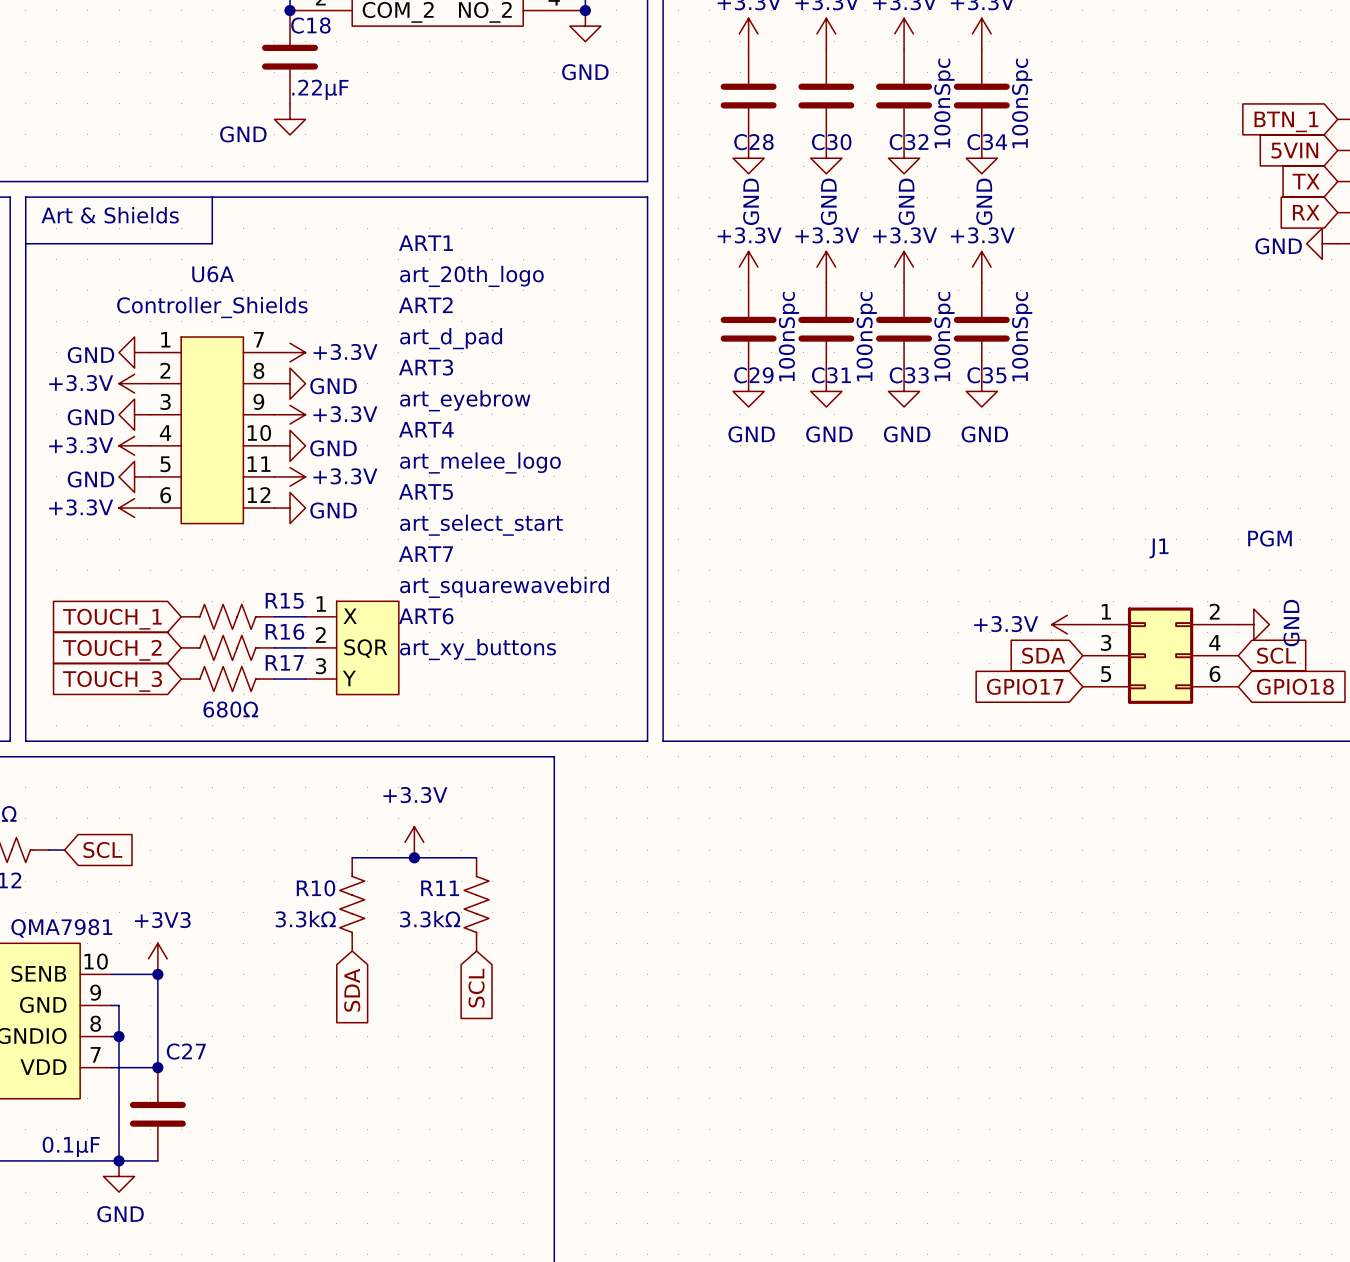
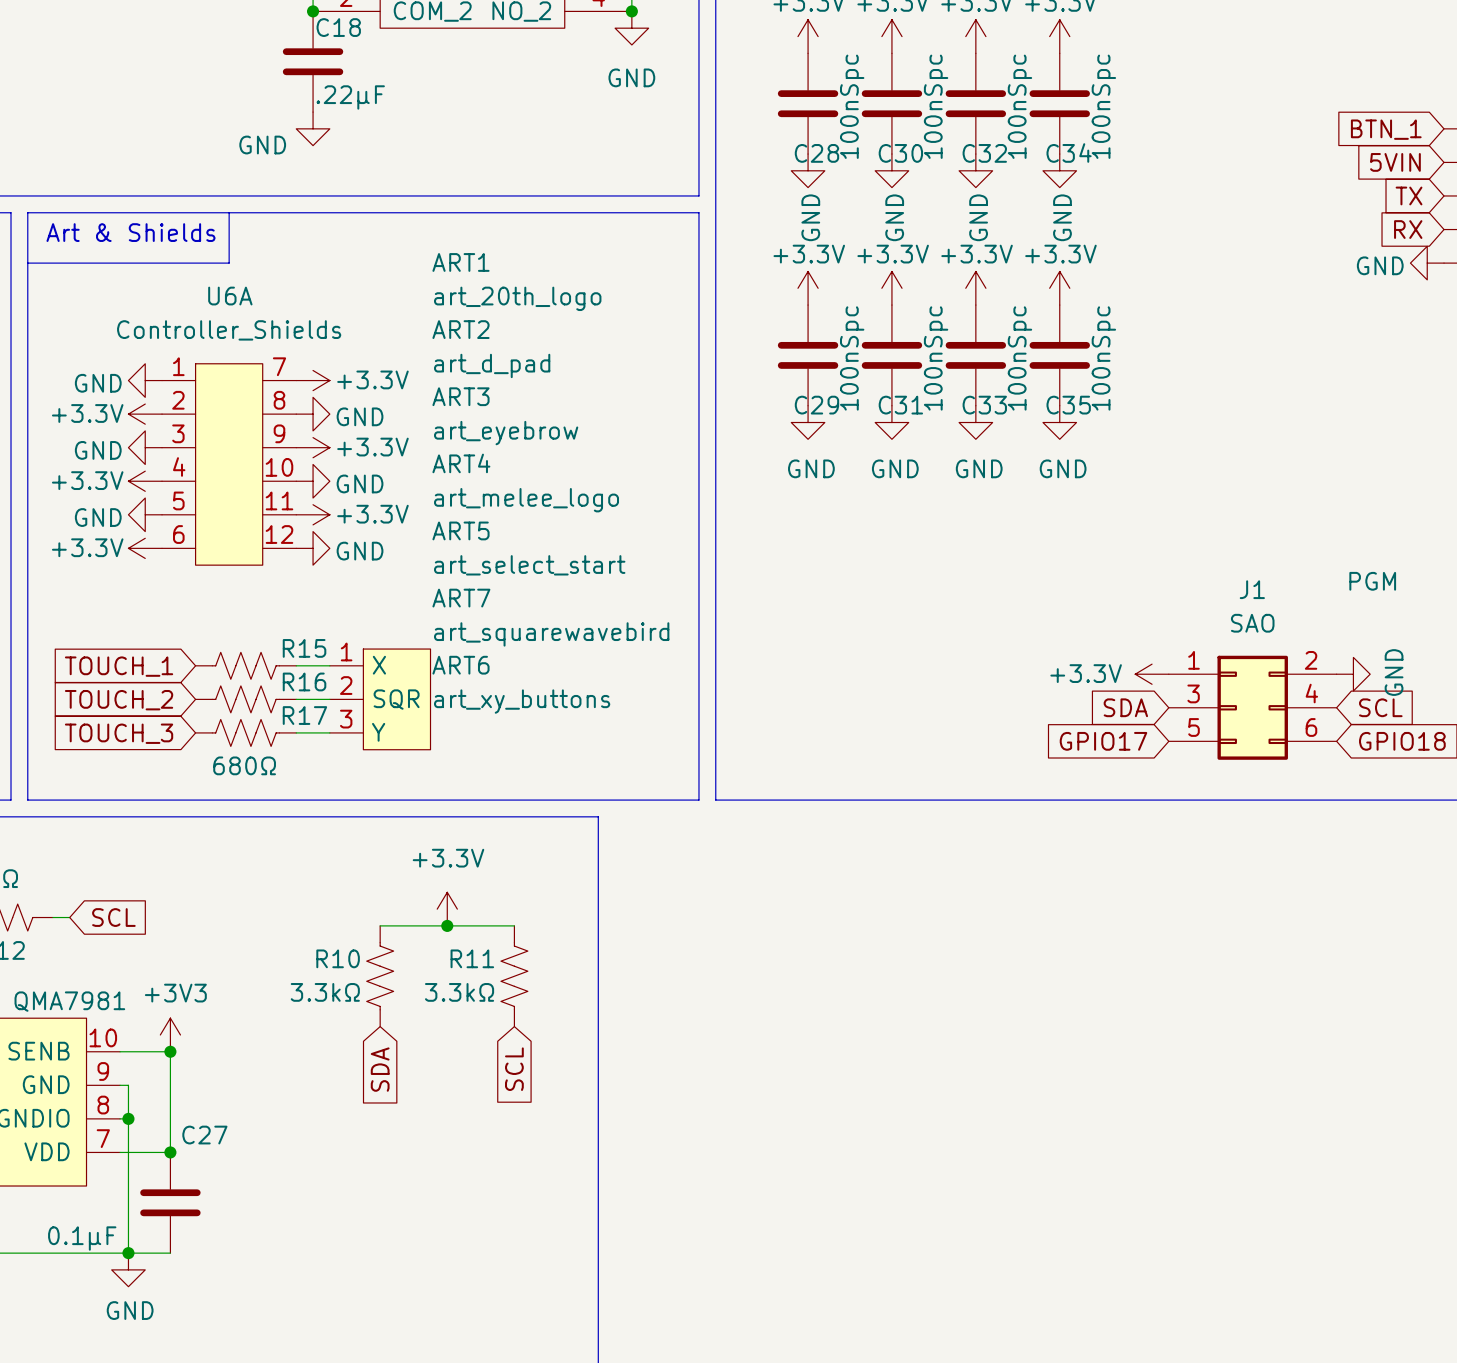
C28 value: none -> 100nSpc (852, 106)
C30 value: none -> 100nSpc (936, 106)
J1 value: none -> SAO (1252, 623)

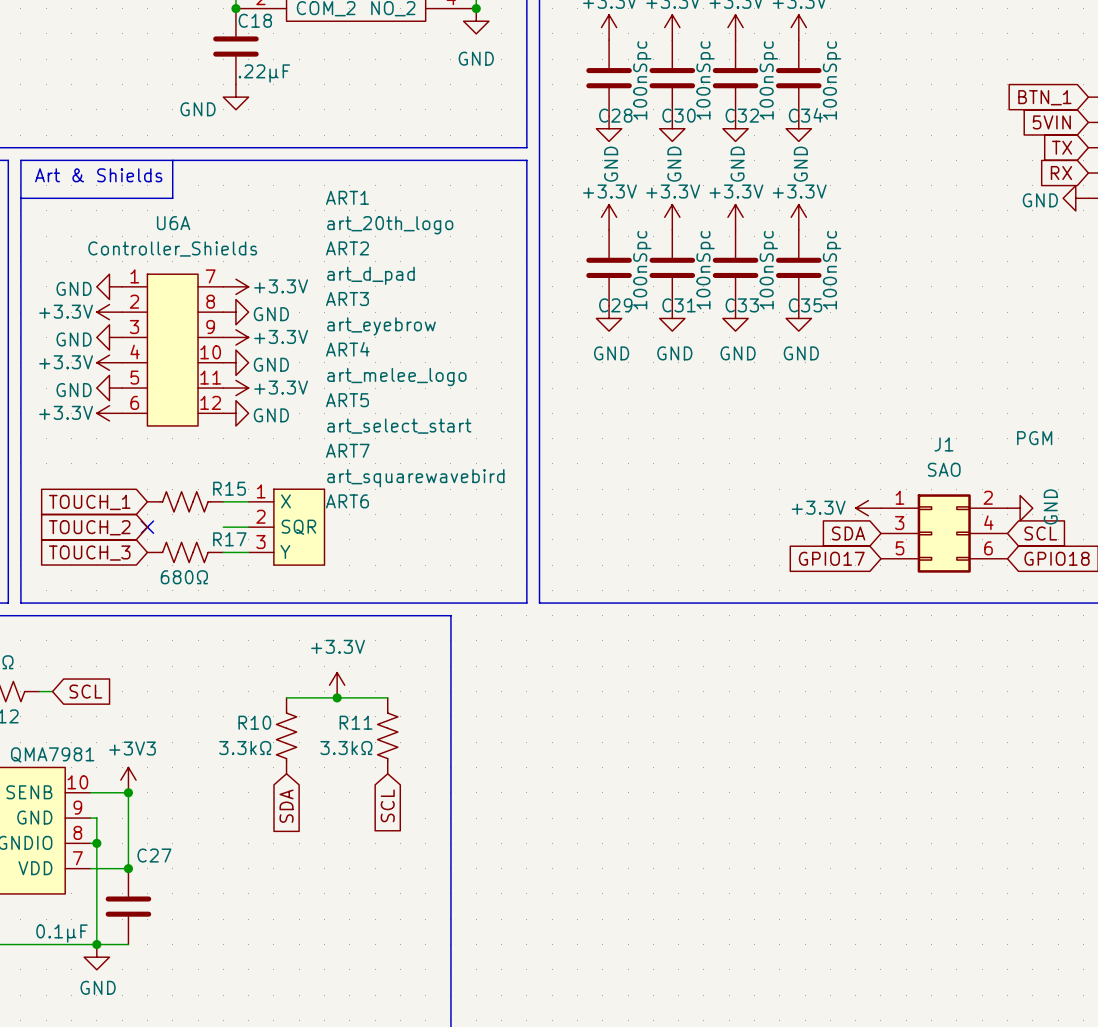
no-connect mark: none -> (147, 527)
R16: (245, 699) -> none
ART6 value: art_xy_buttons (522, 701) -> none

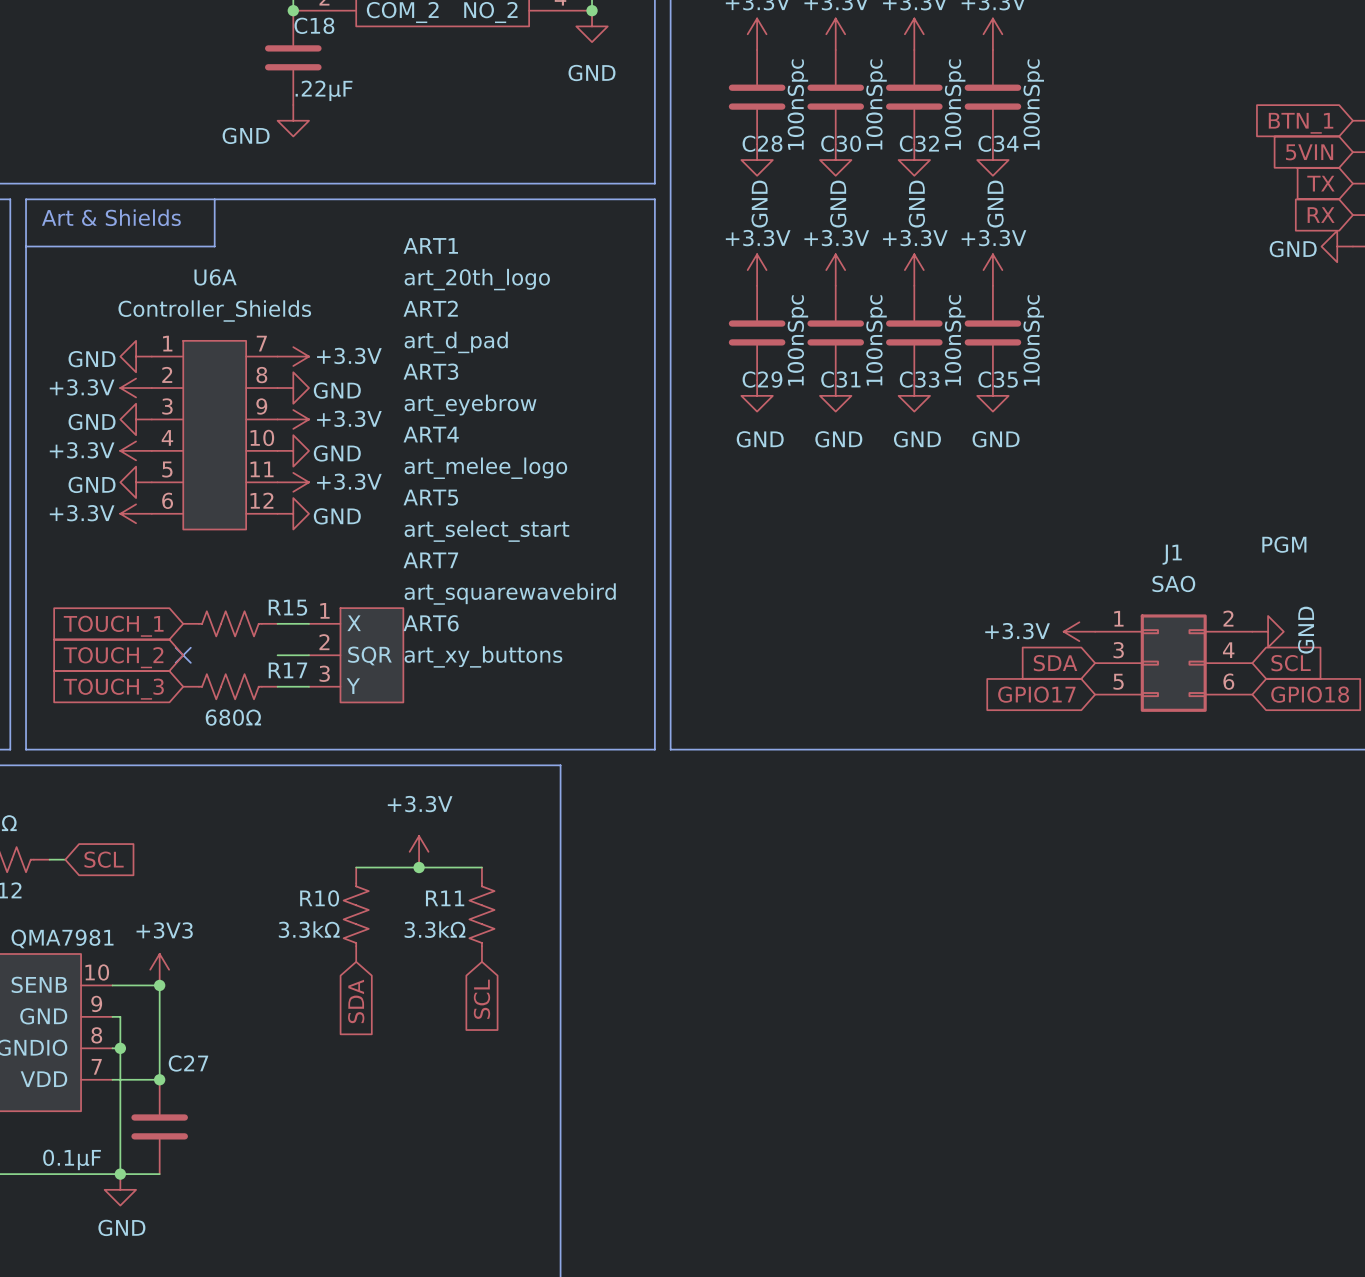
ART6 value: none -> art_xy_buttons (483, 656)

